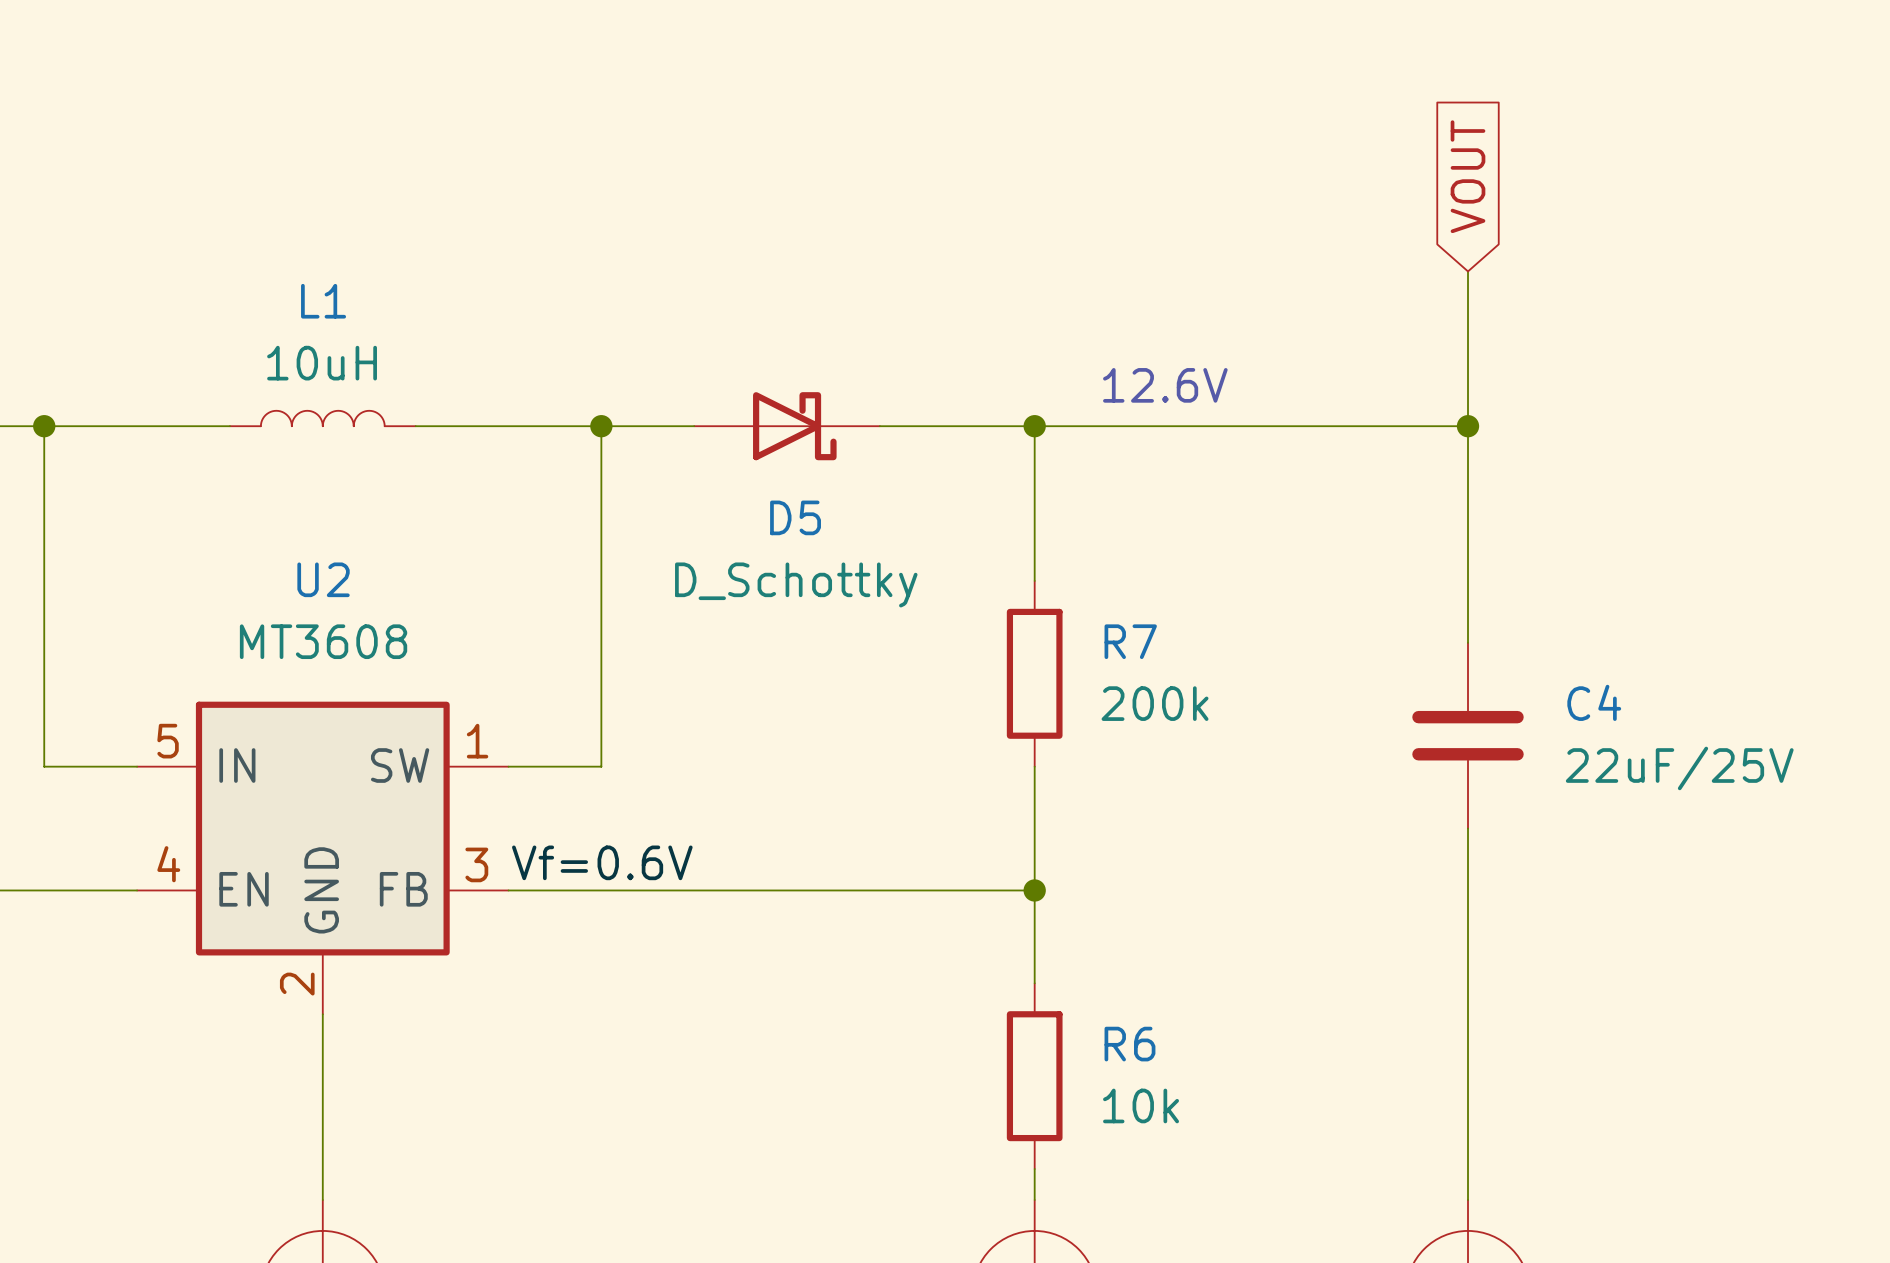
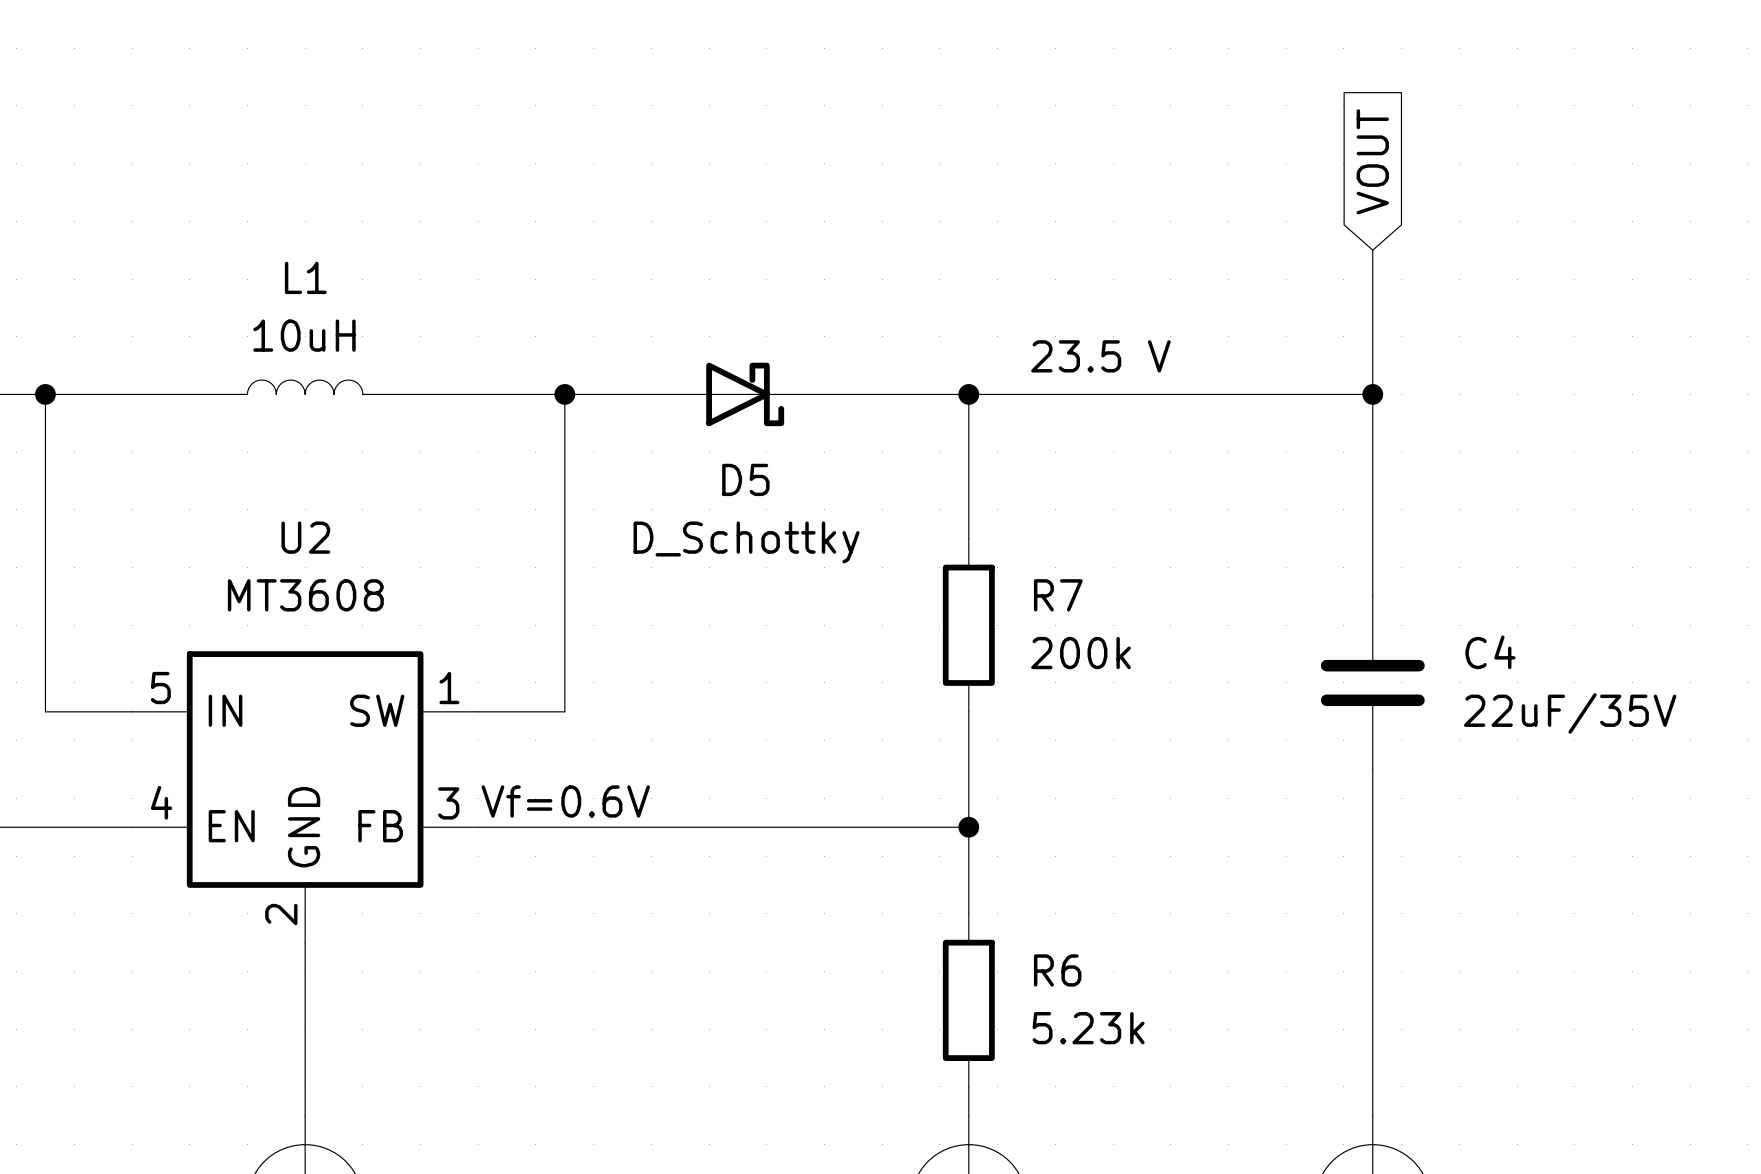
text: 12.6V (1165, 385) -> 23.5 V (1100, 356)
C4 value: 22uF/25V (1679, 768) -> 22uF/35V (1570, 713)
R6 value: 10k (1141, 1105) -> 5.23k (1088, 1028)

